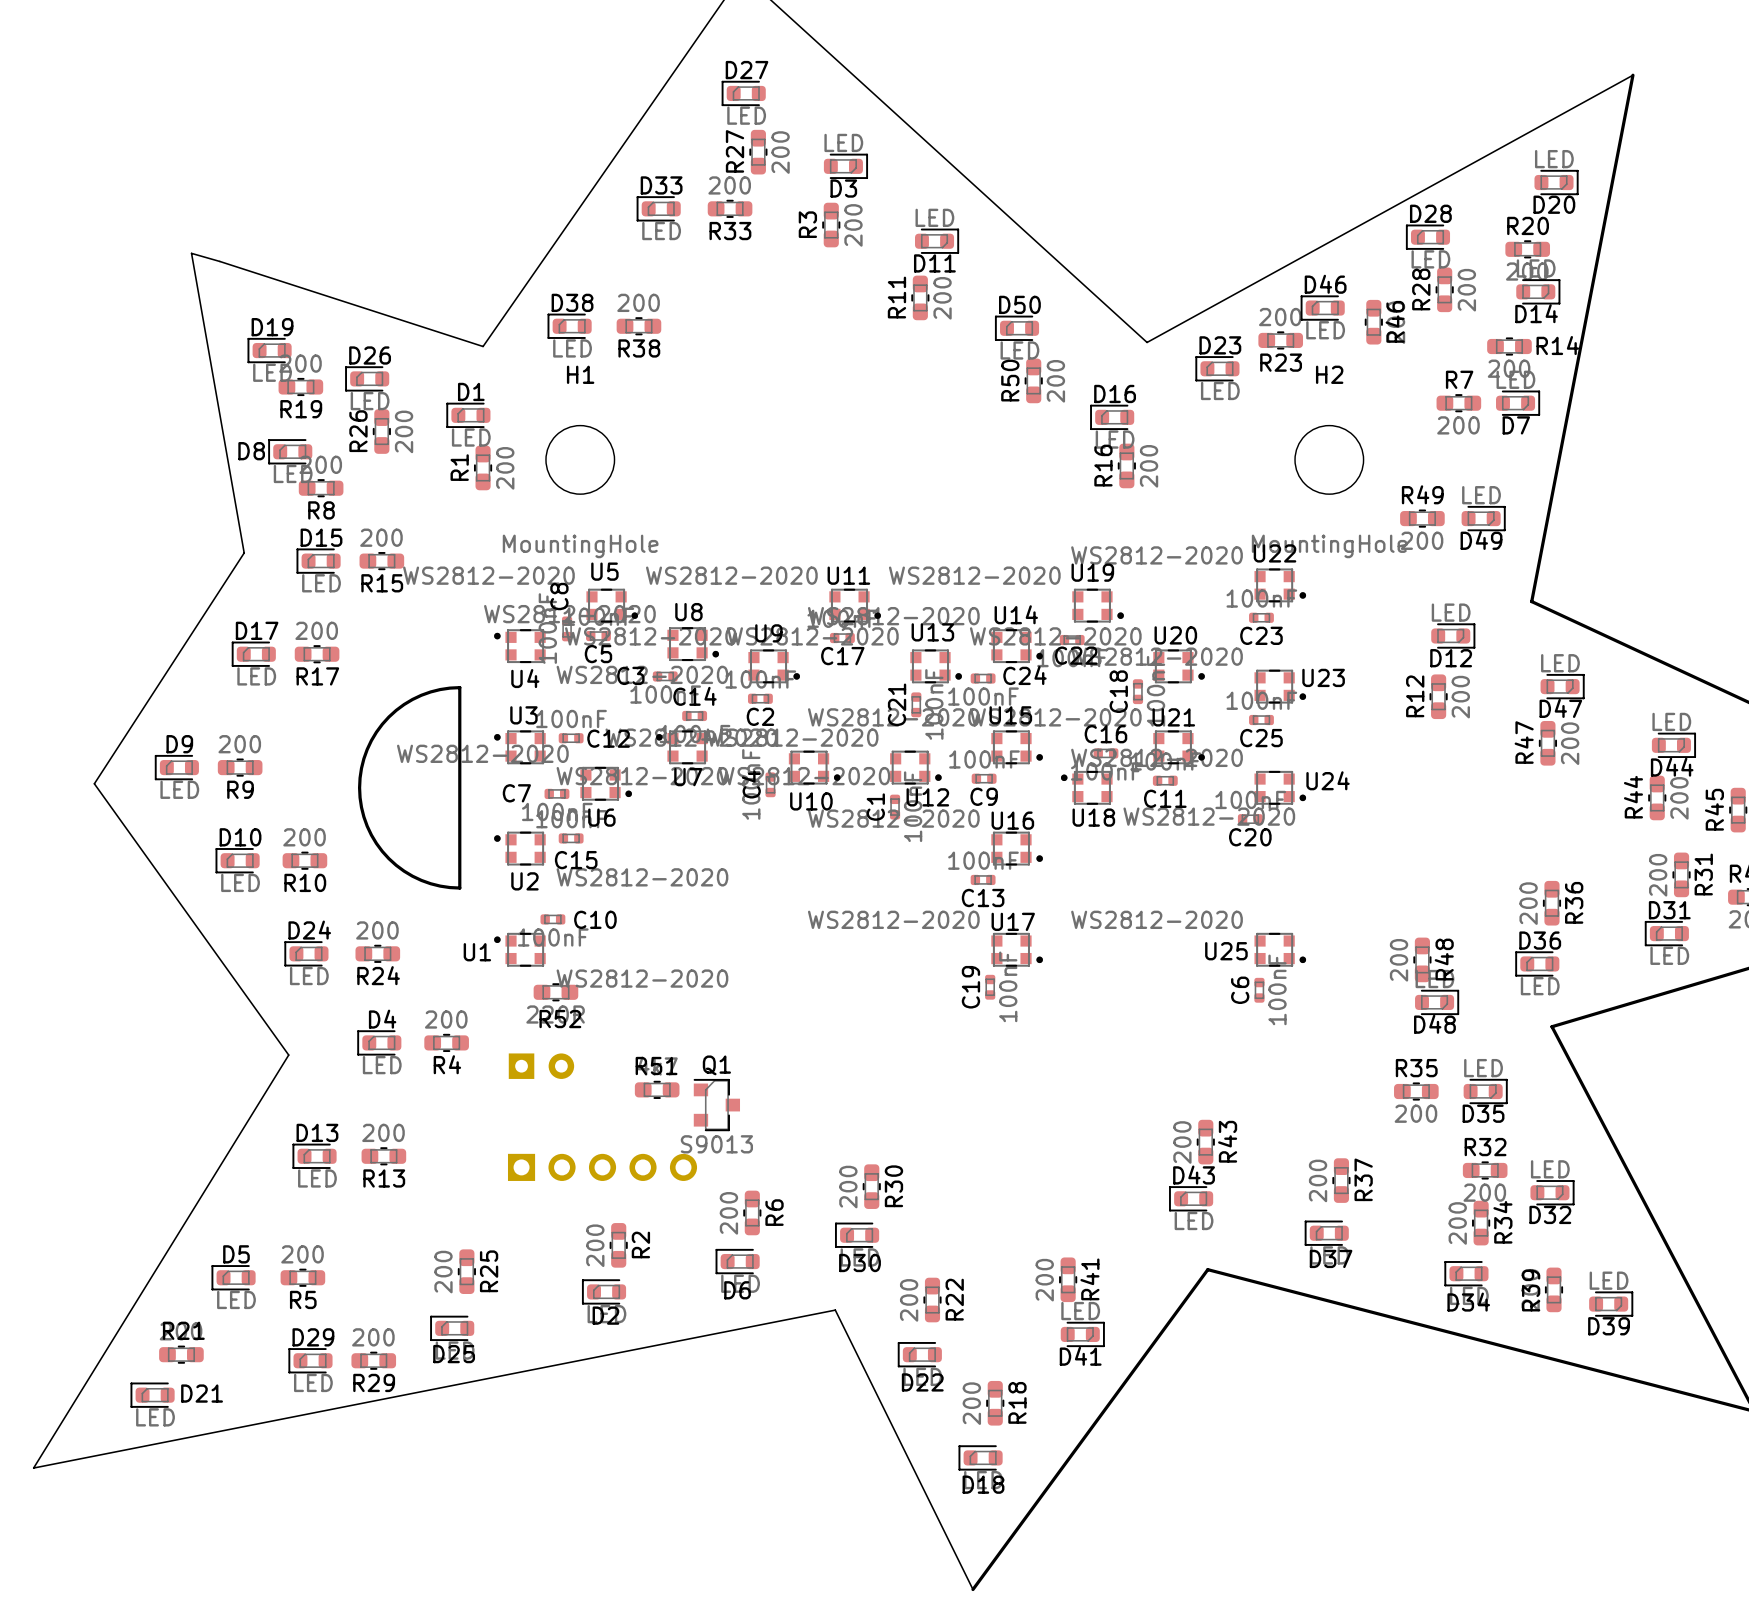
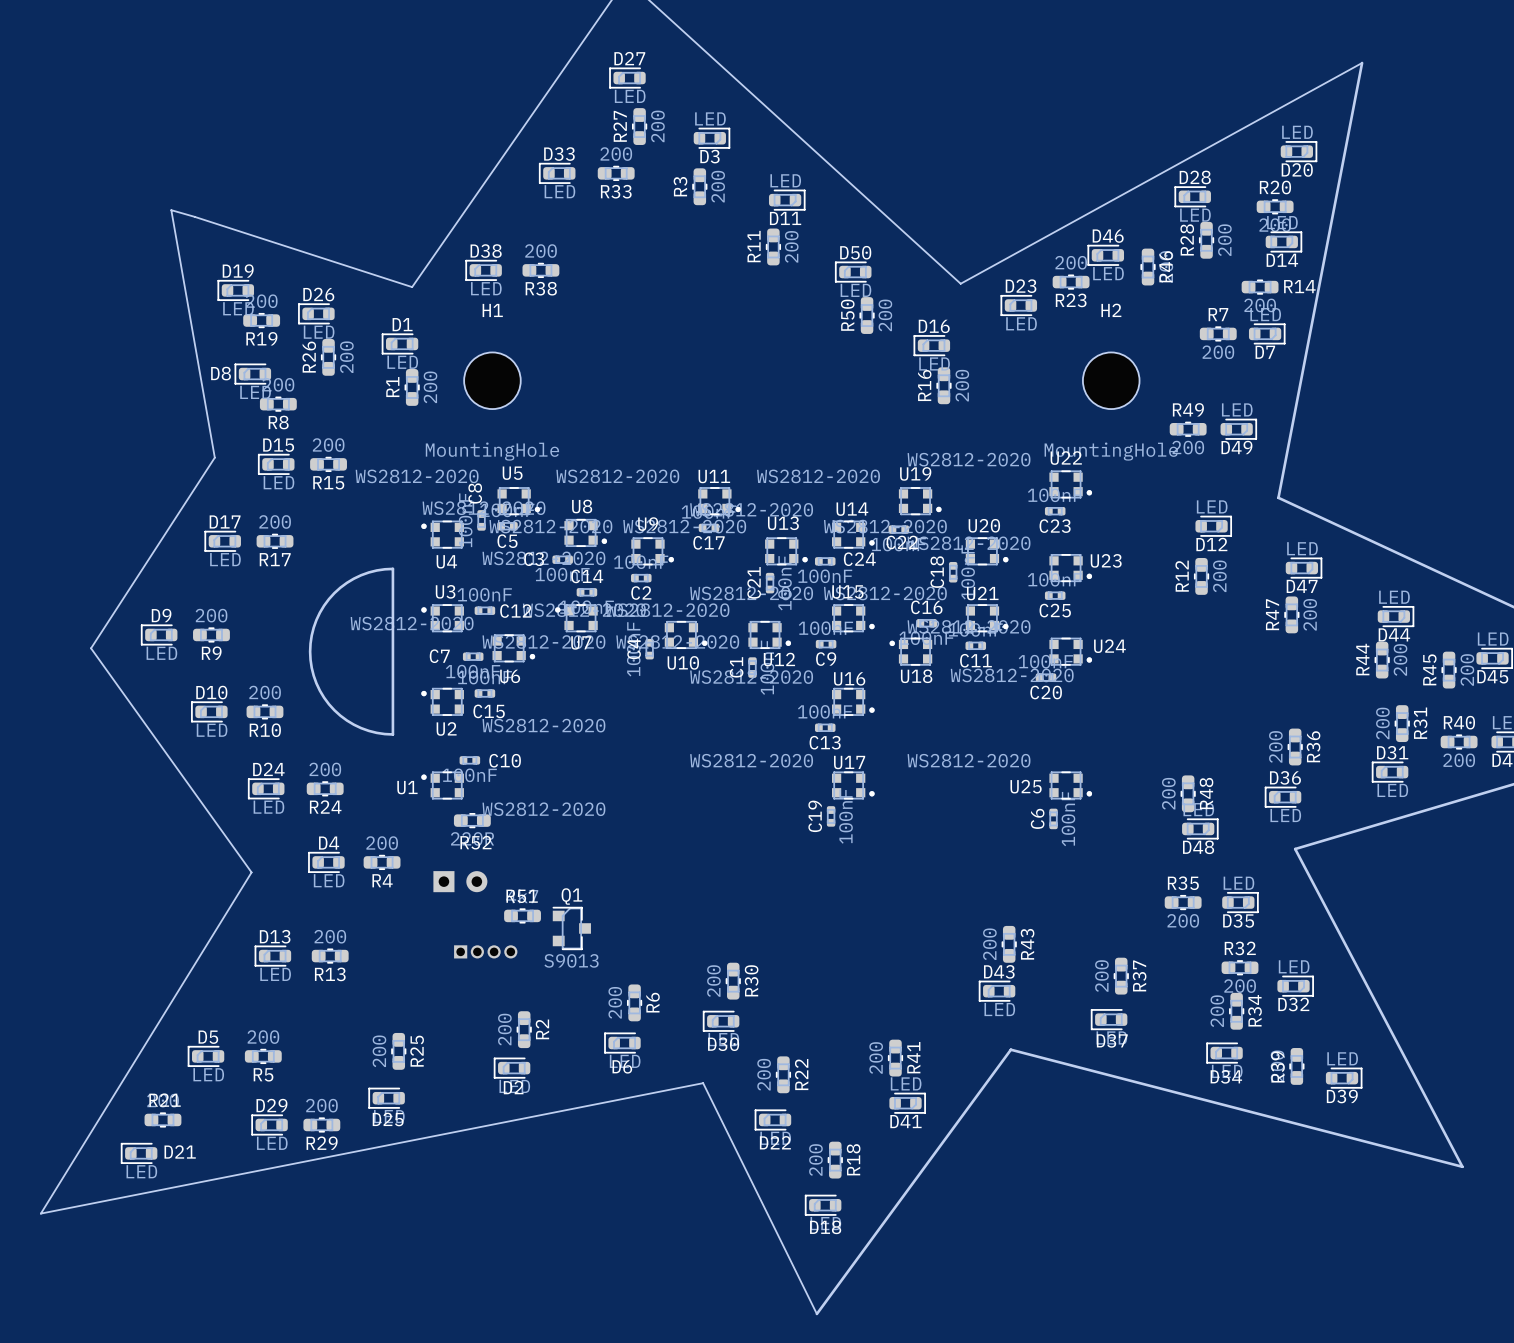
R51 position: (657, 1089) -> (522, 915)
Q1 position: (716, 1105) -> (571, 928)
part: none -> (485, 951)
part: (602, 1167) -> none

